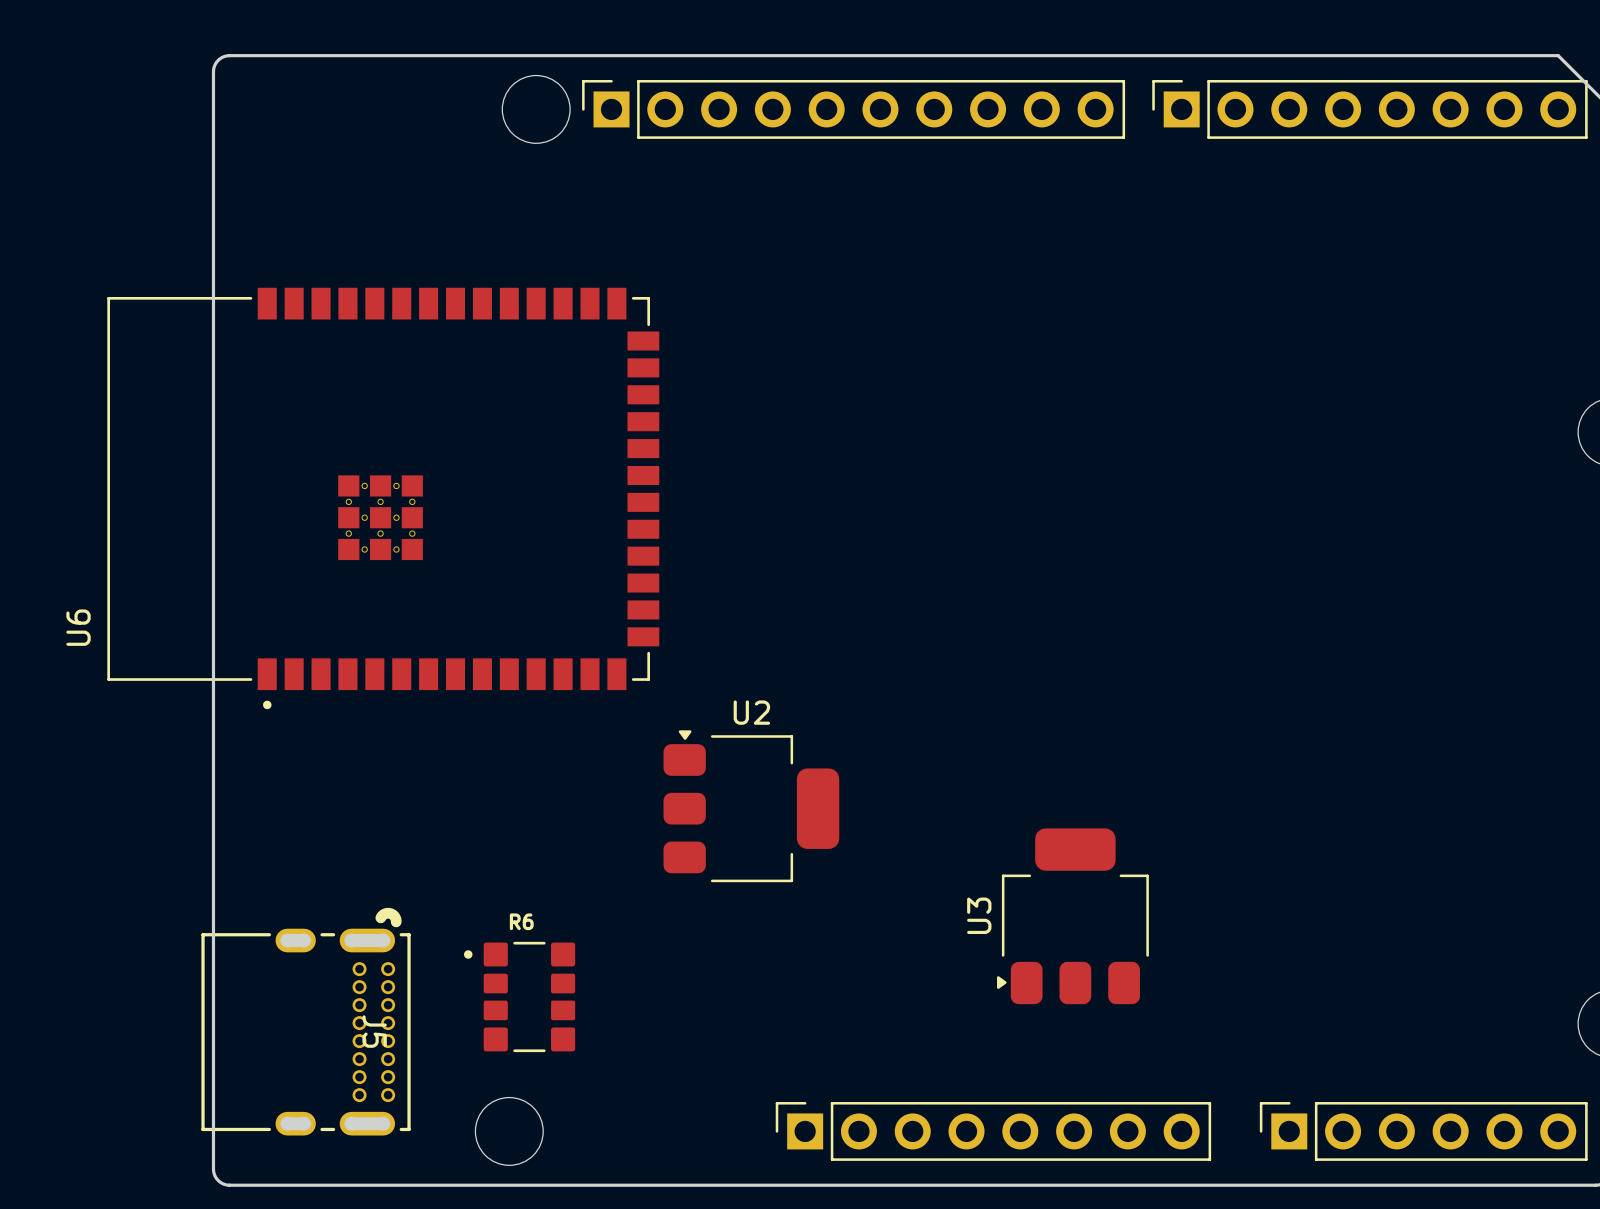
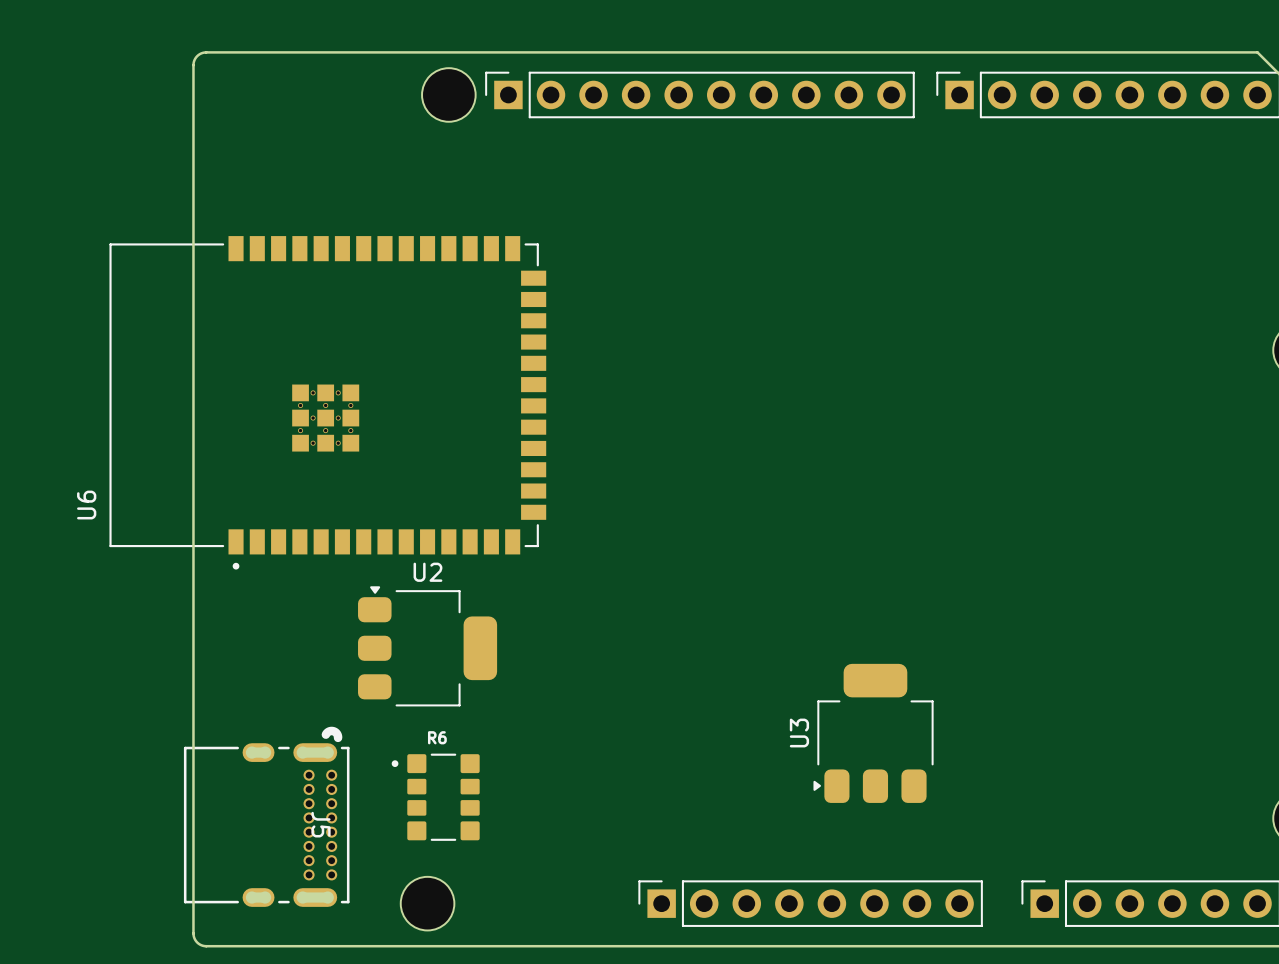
U2 position: (751, 806) -> (427, 646)

